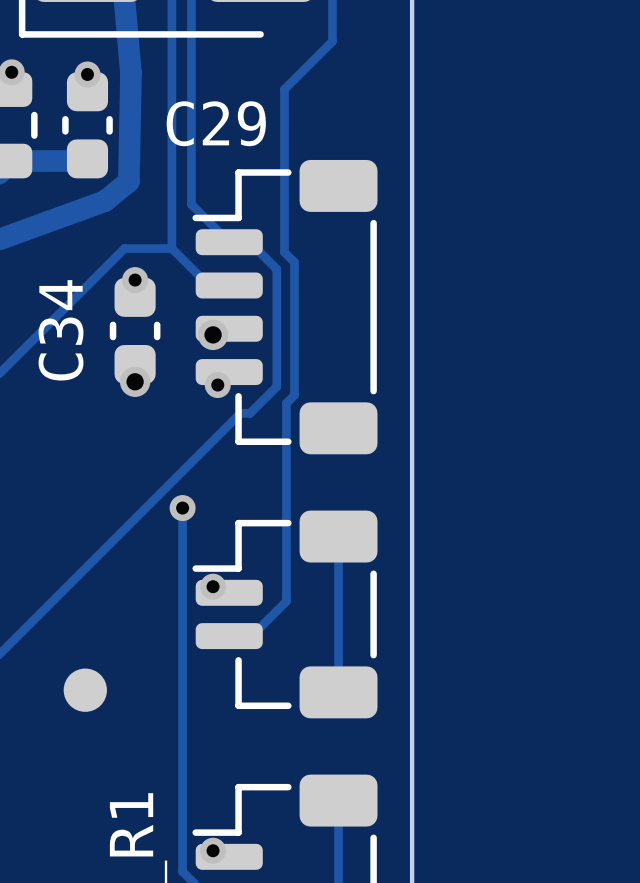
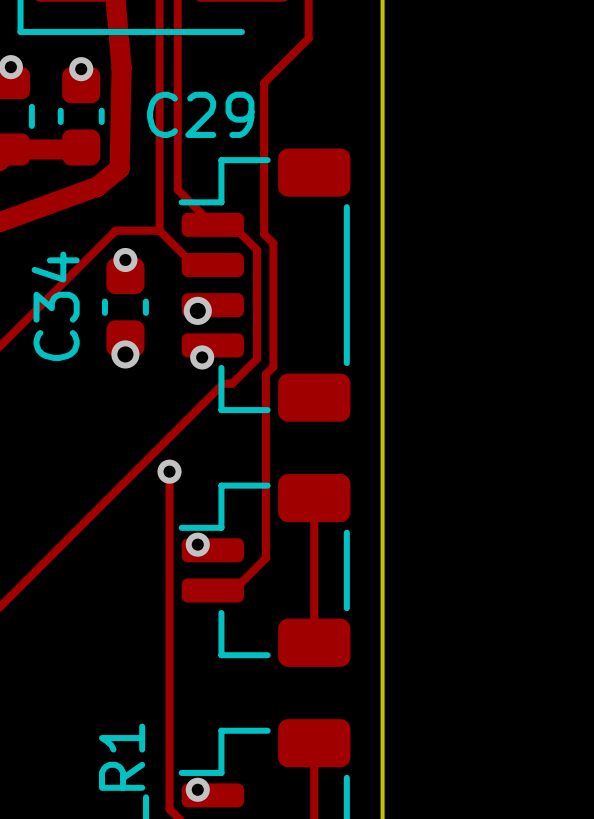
part: (85, 690) -> none

